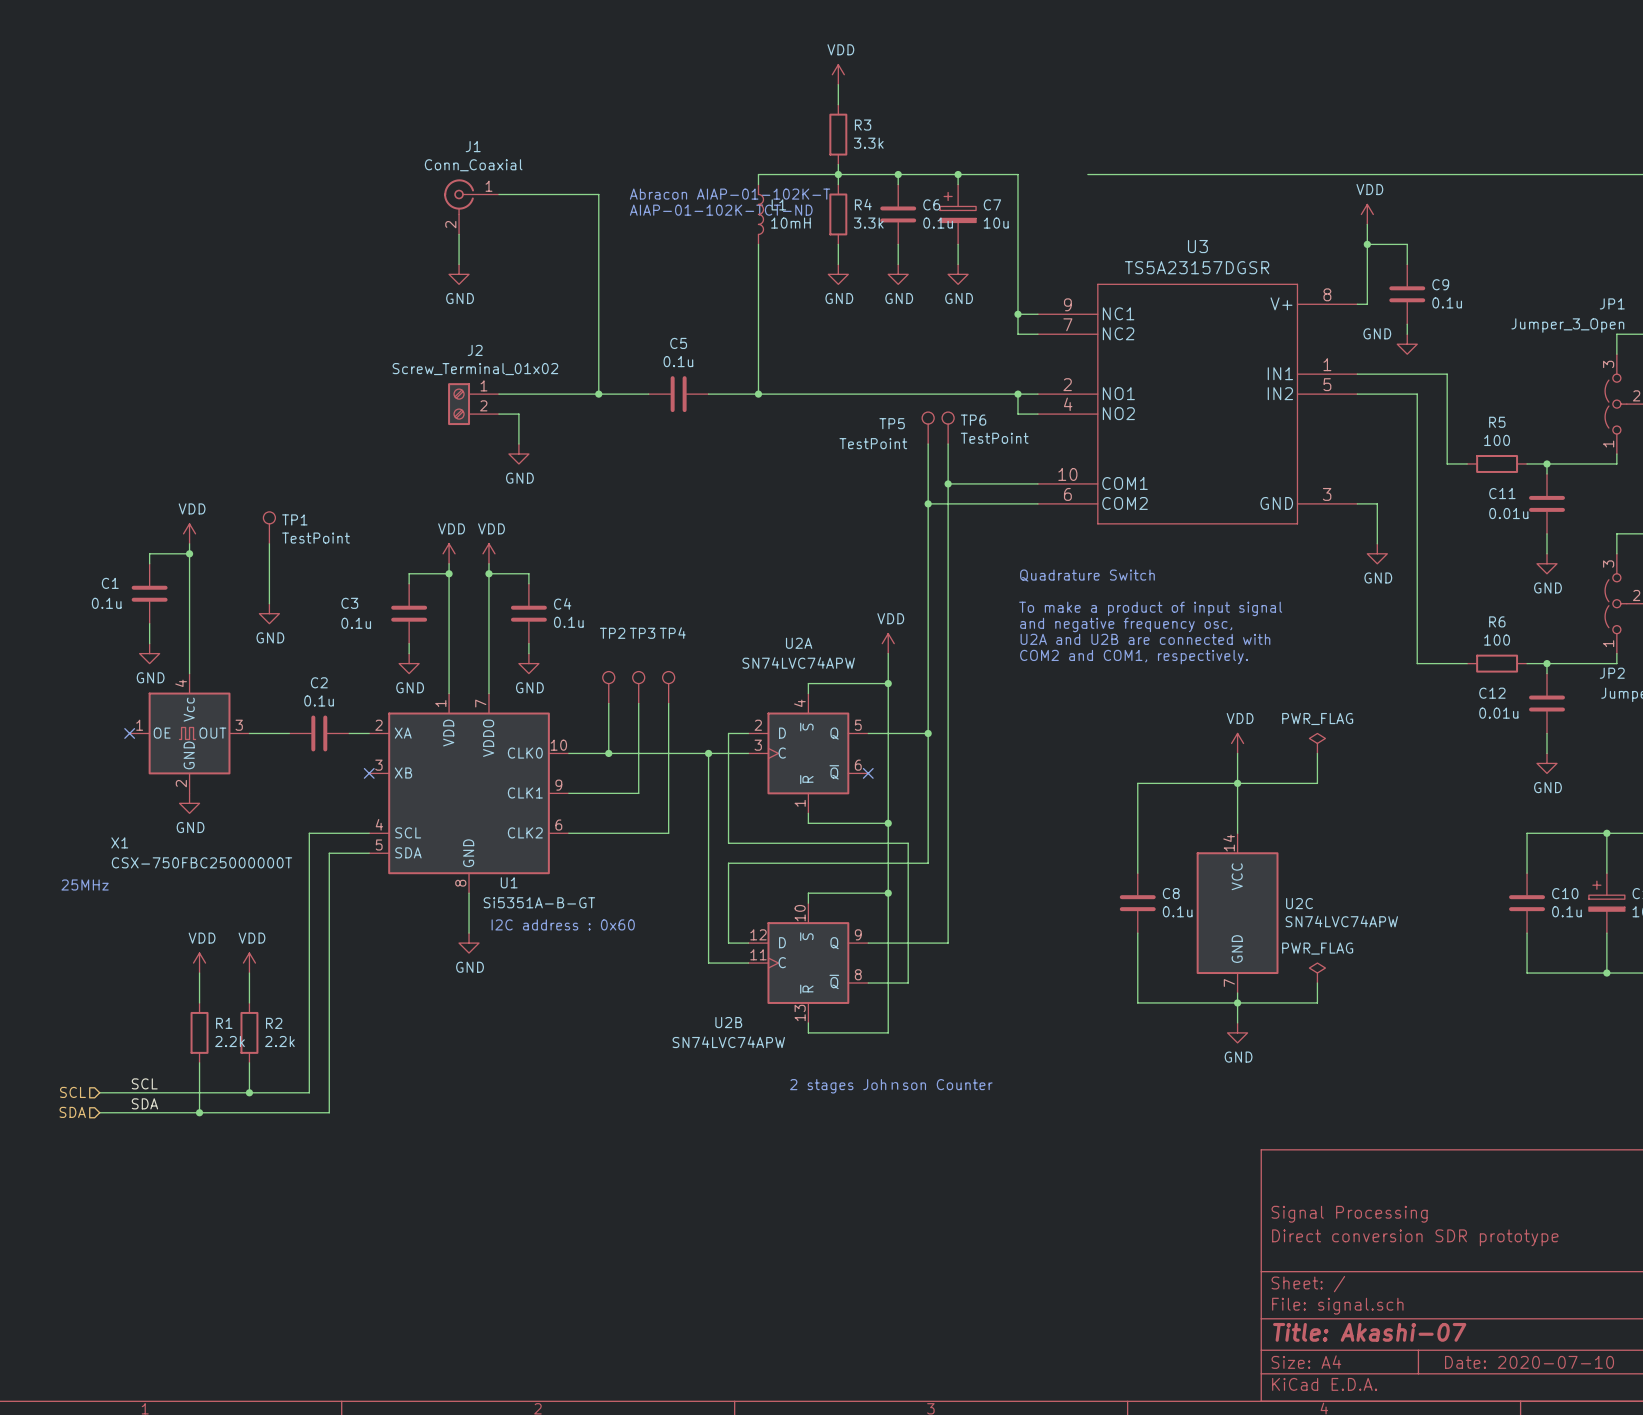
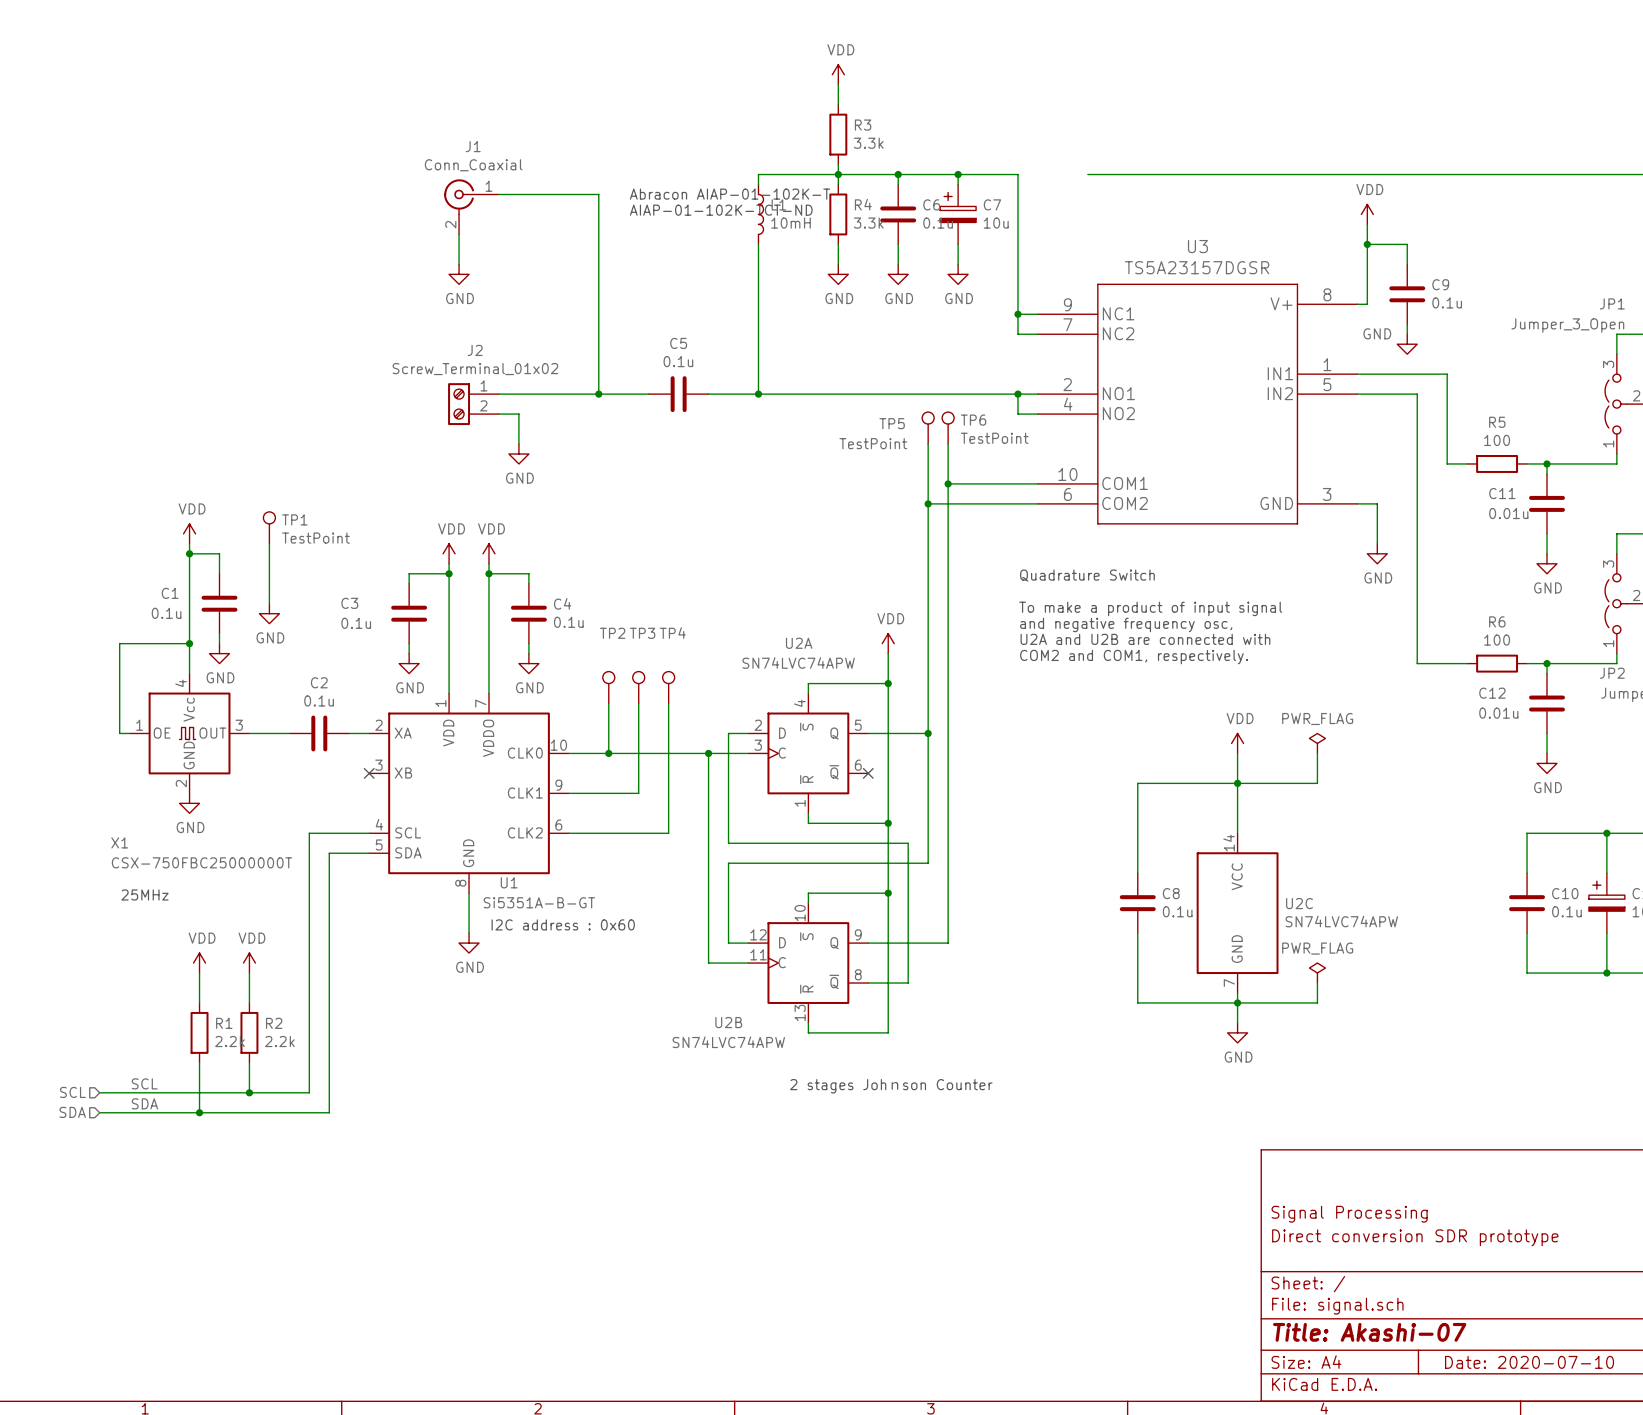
wire: (189, 553) (149, 553) (149, 563) -> (189, 553) (219, 553) (219, 573)
C1 name position: C1 (110, 583) -> C1 (170, 593)
C1 position: (149, 593) -> (219, 603)
C1 value position: 0.1u (106, 603) -> 0.1u (166, 613)
wire: (149, 623) (149, 643) -> none
wire: none -> (219, 633) (219, 643)
wire: none -> (189, 643) (119, 643) (119, 733) (129, 733)
junction: none -> (189, 643)
power symbol position: GND (149, 653) -> GND (219, 653)
no-connect mark: (129, 733) -> none
text position: 25MHz (85, 885) -> 25MHz (144, 894)

